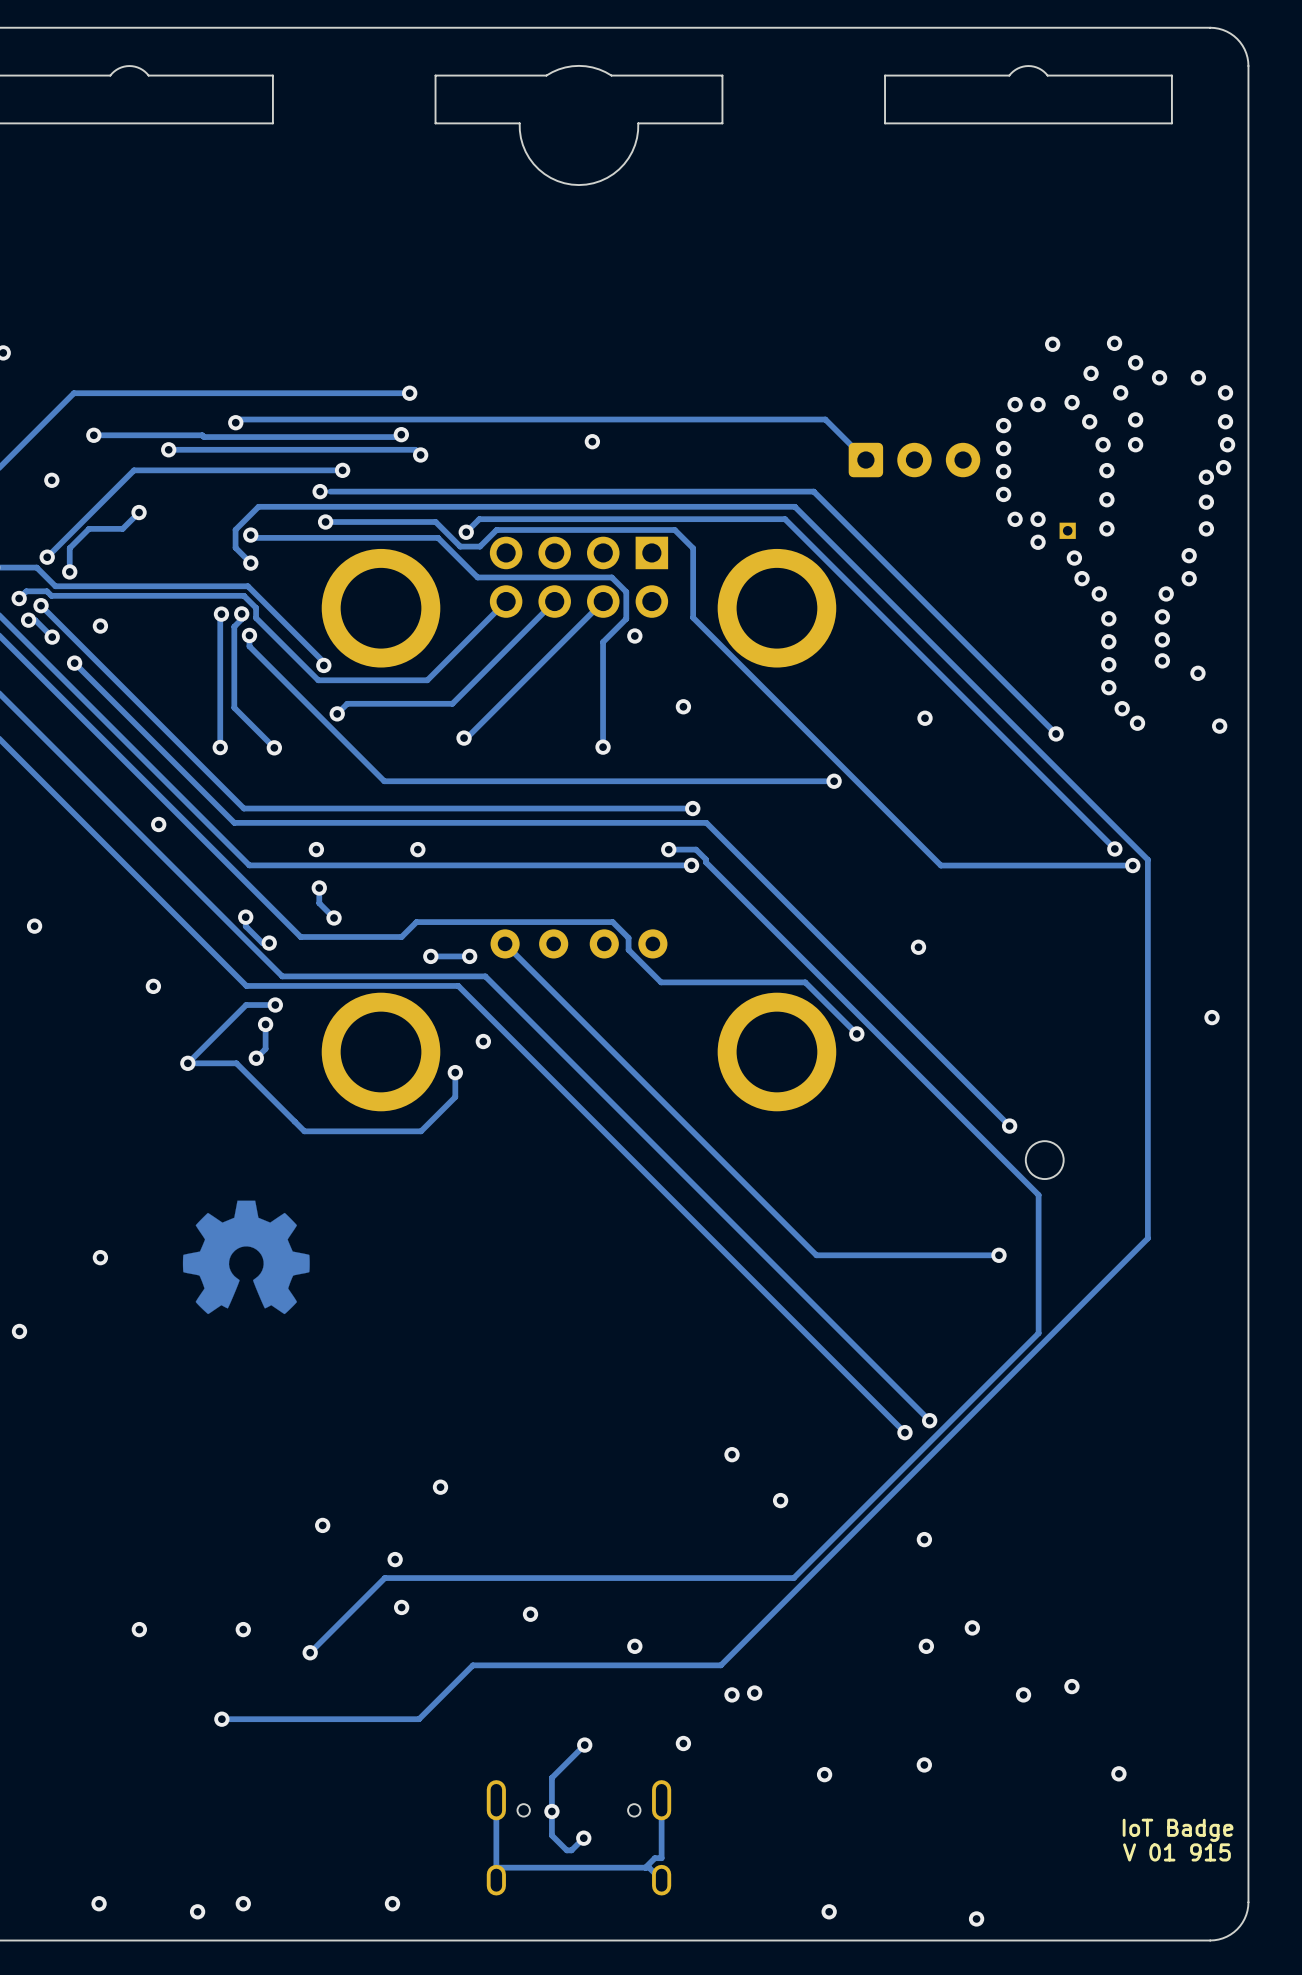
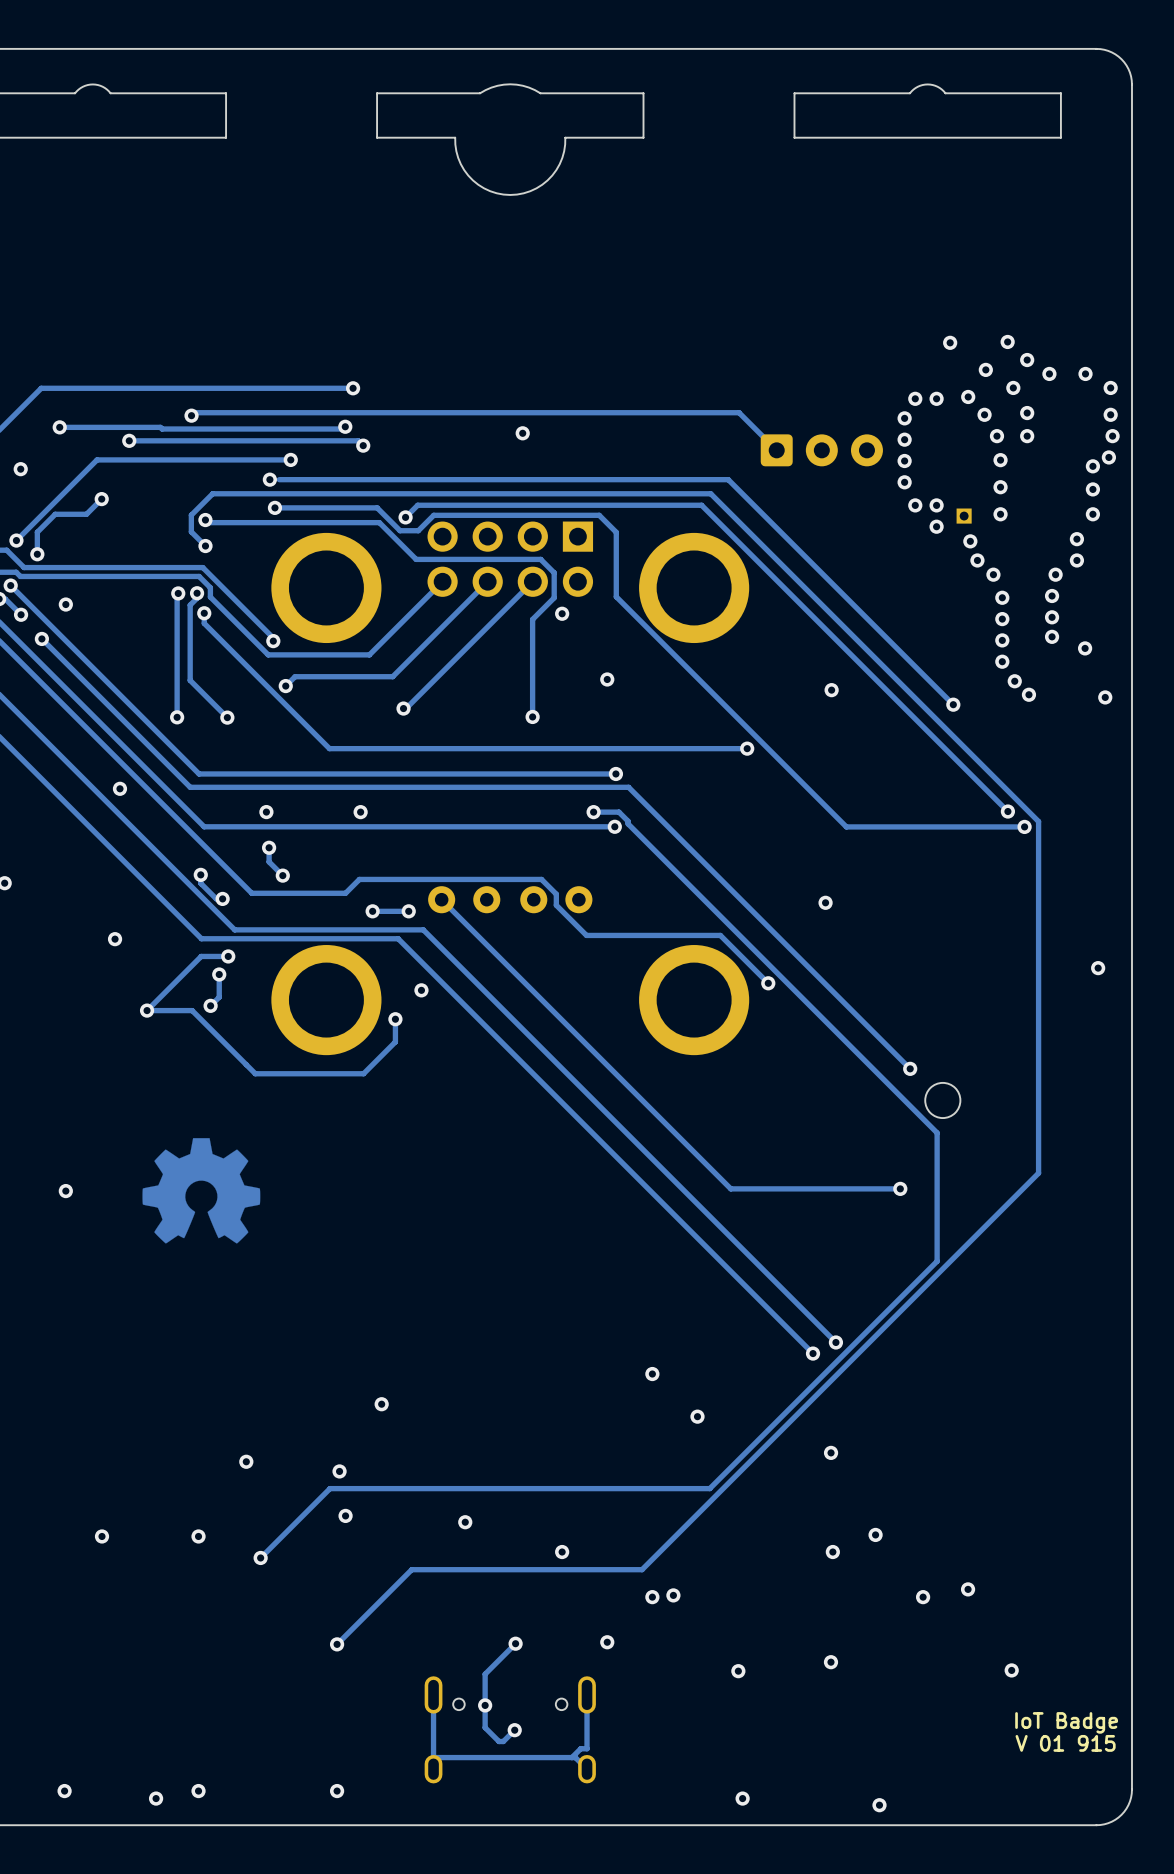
via position: (322, 1525) -> (246, 1461)
via: (221, 1719) -> none
track: (419, 1719) (221, 1719) -> (361, 1619) (337, 1644)
via: none -> (337, 1644)

